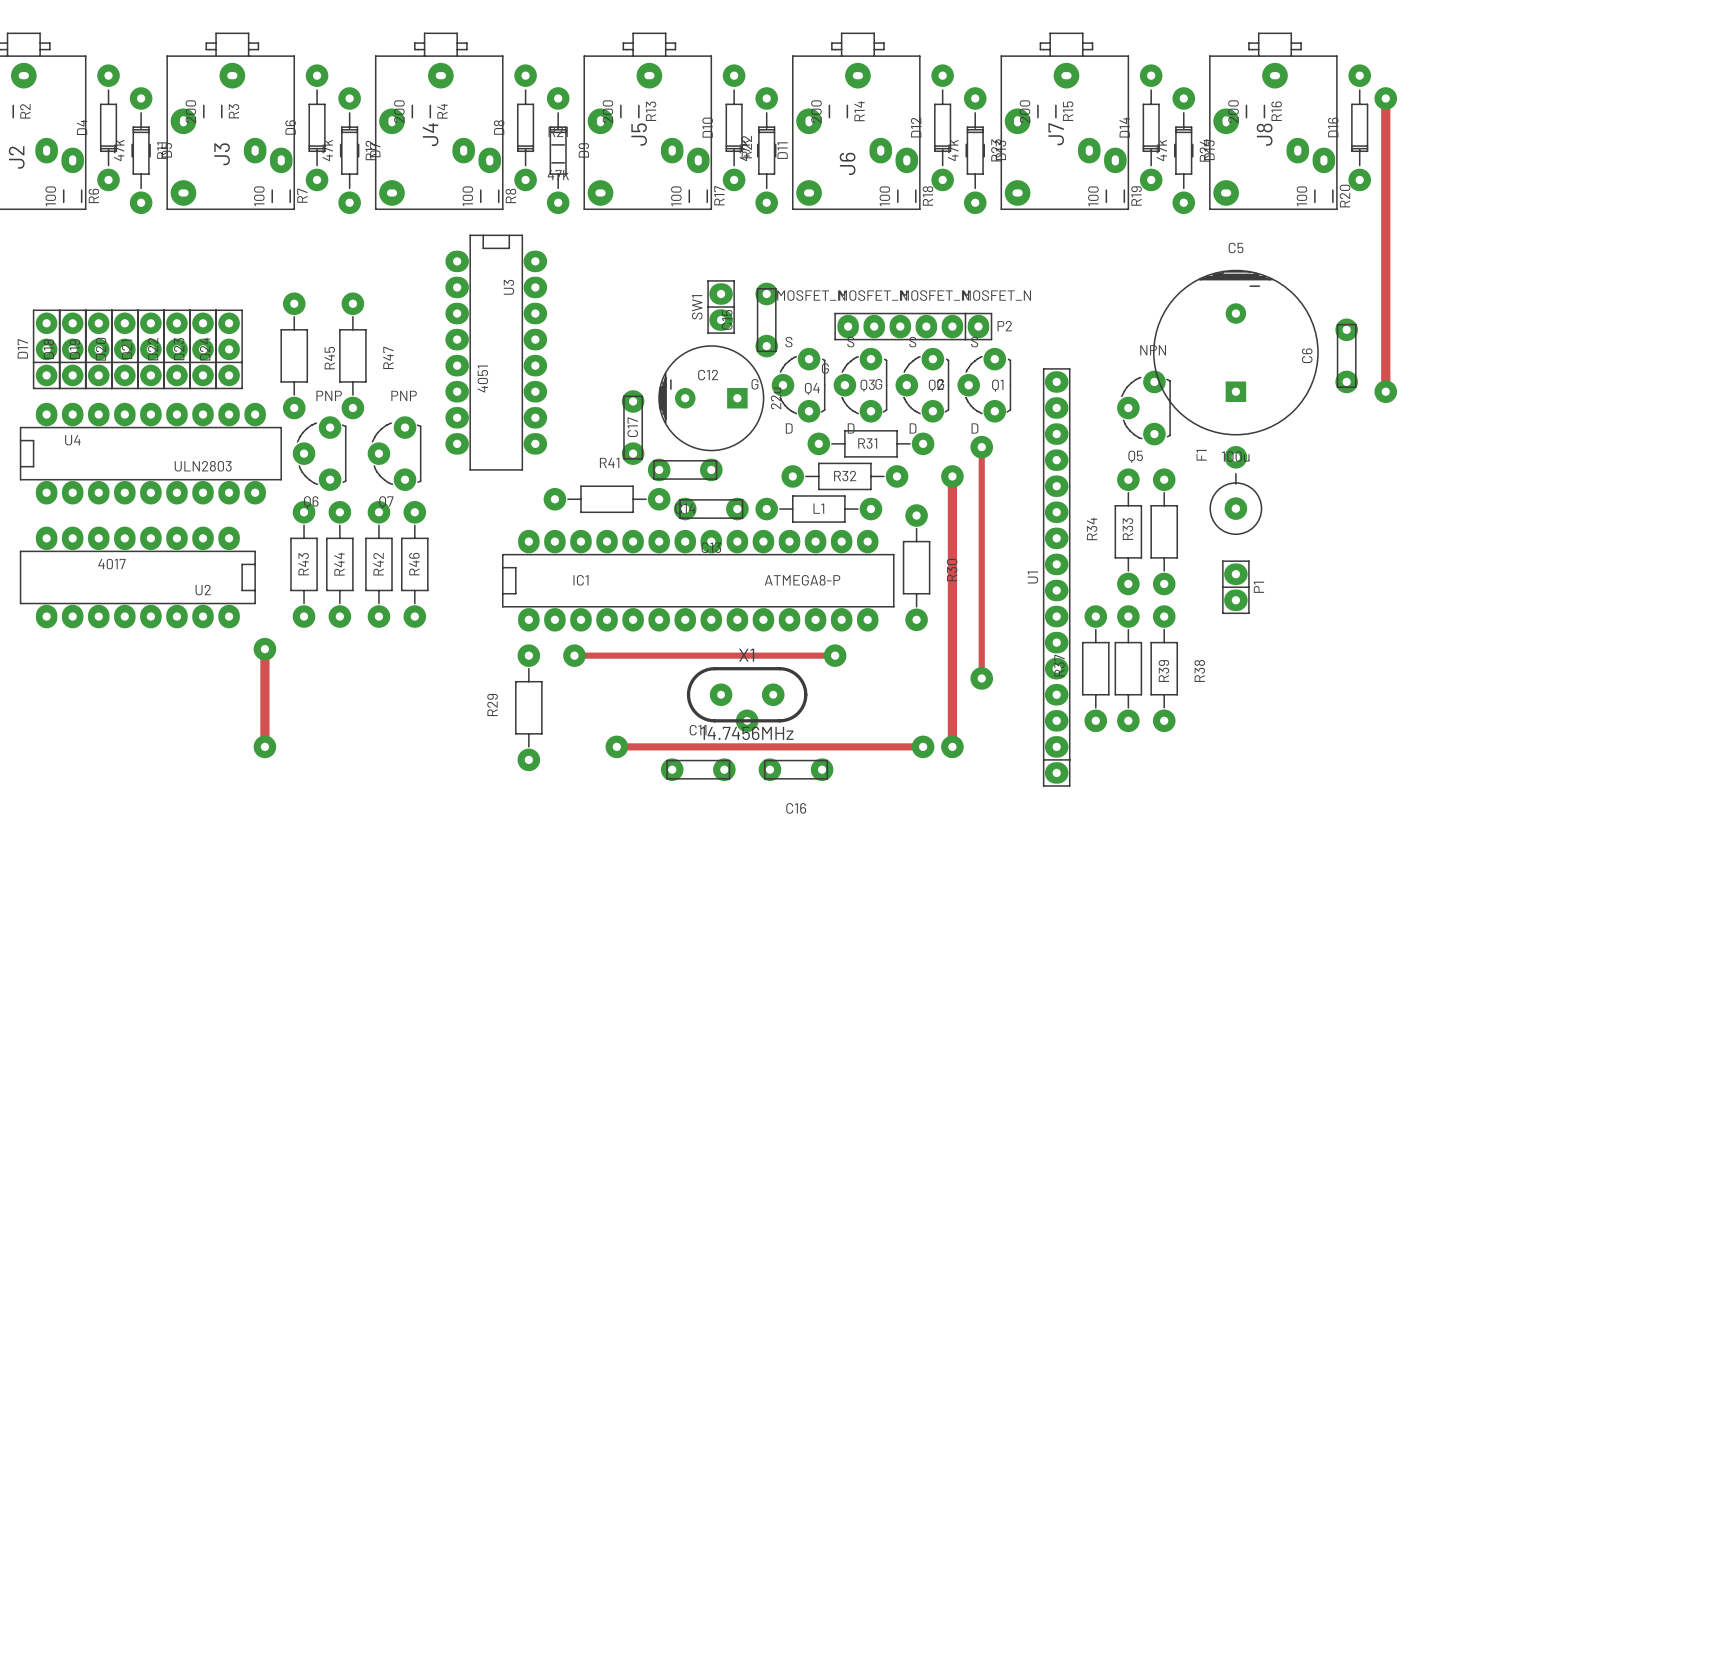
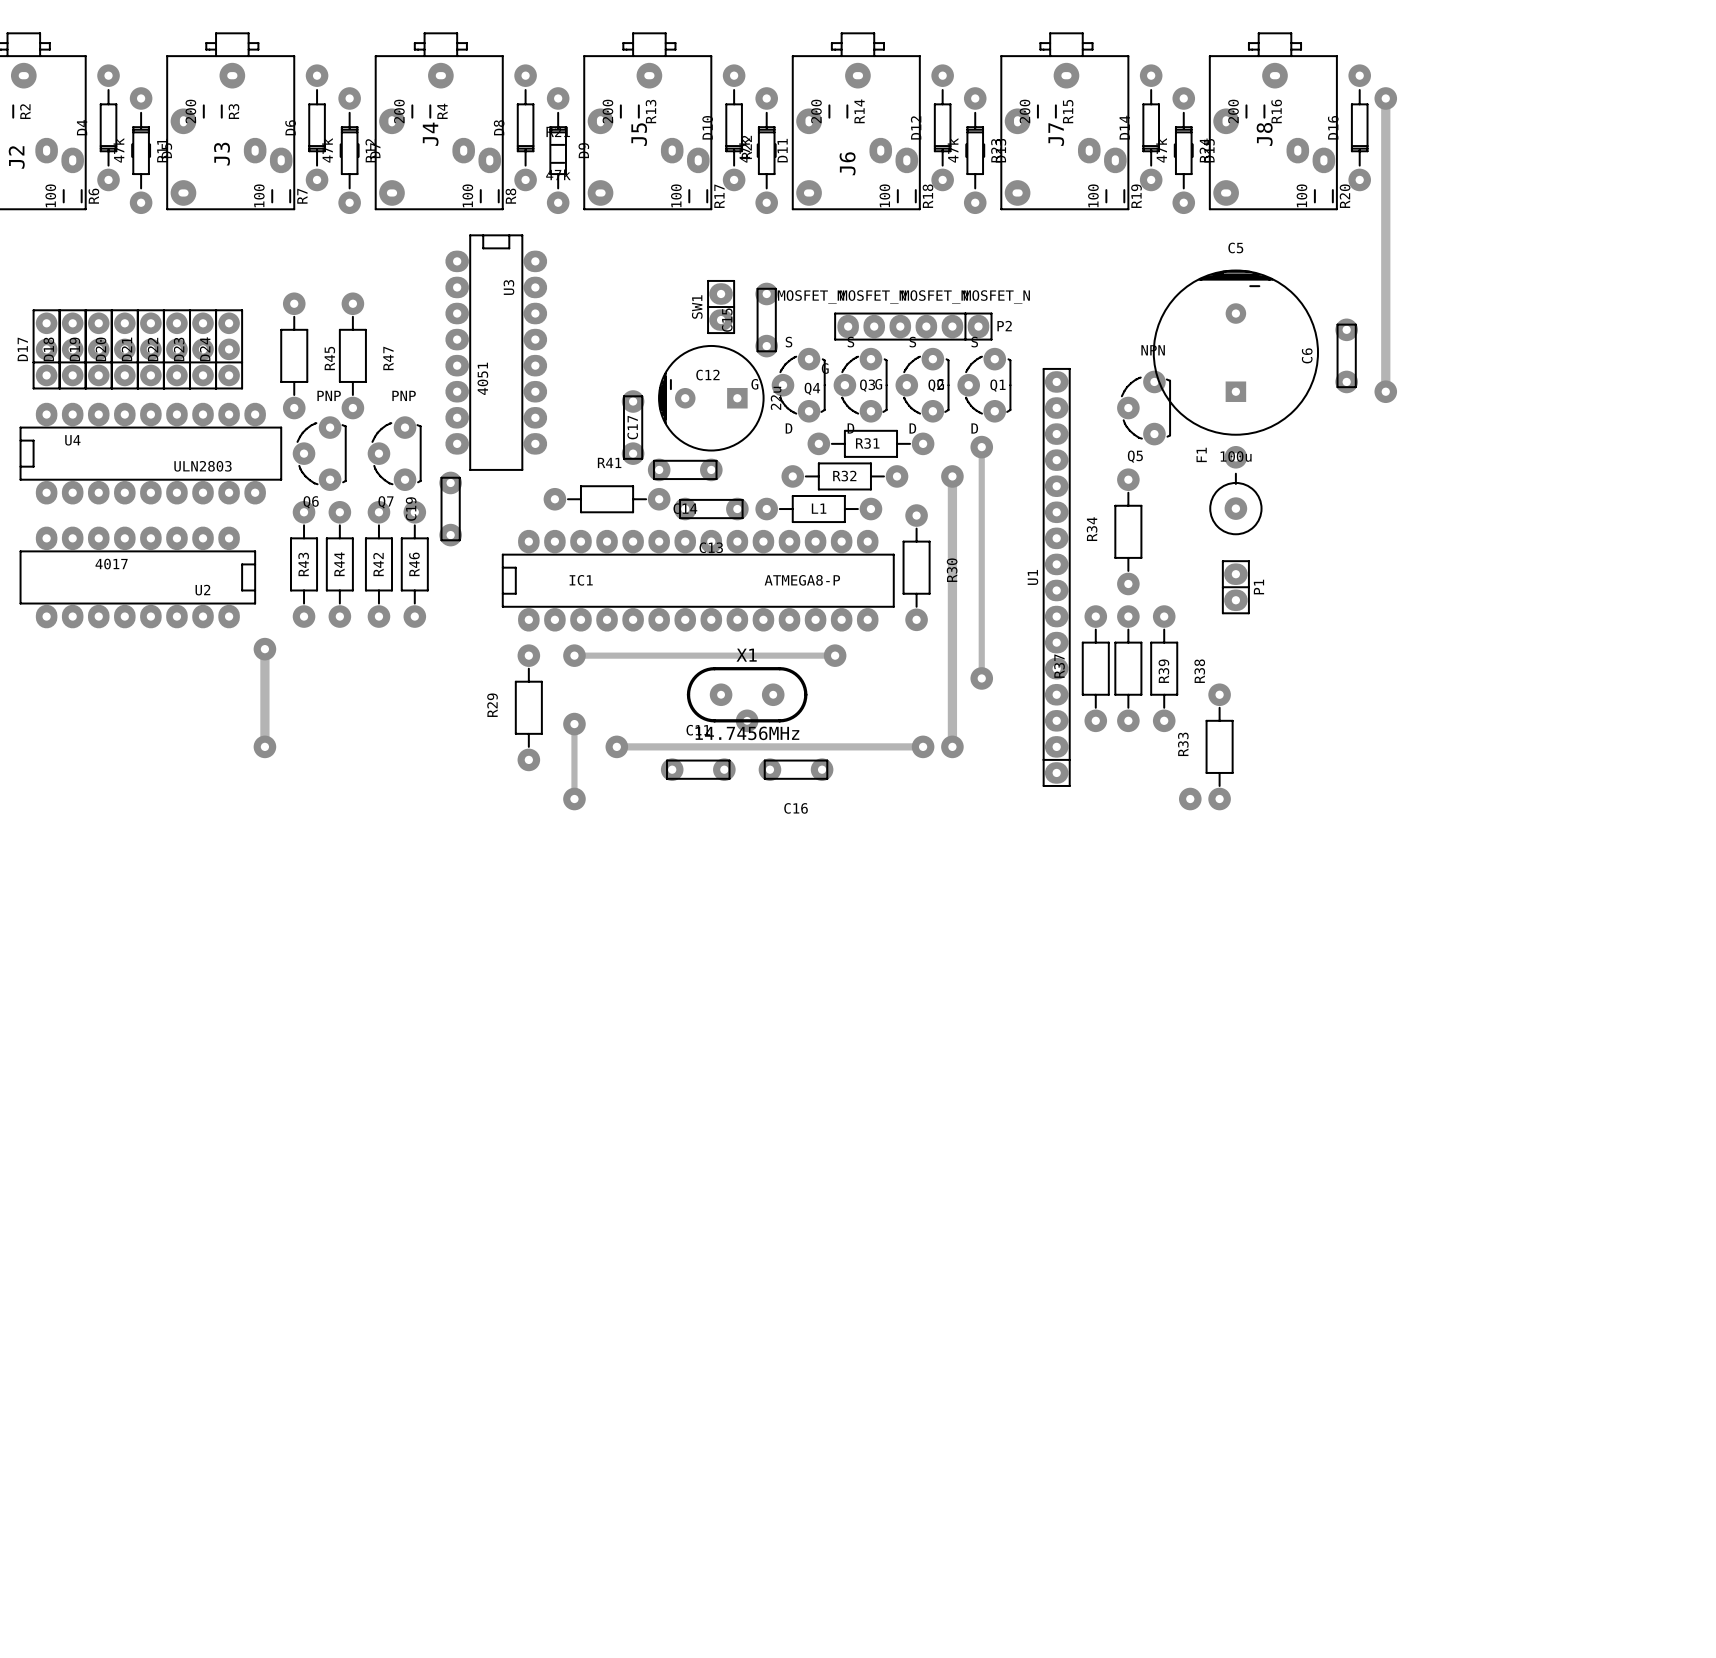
C19: none -> (450, 509)
R33 position: (1164, 531) -> (1219, 746)
track: none -> (574, 724) (574, 799)
via: none -> (574, 724)
via: none -> (574, 799)
via: none -> (1190, 799)

